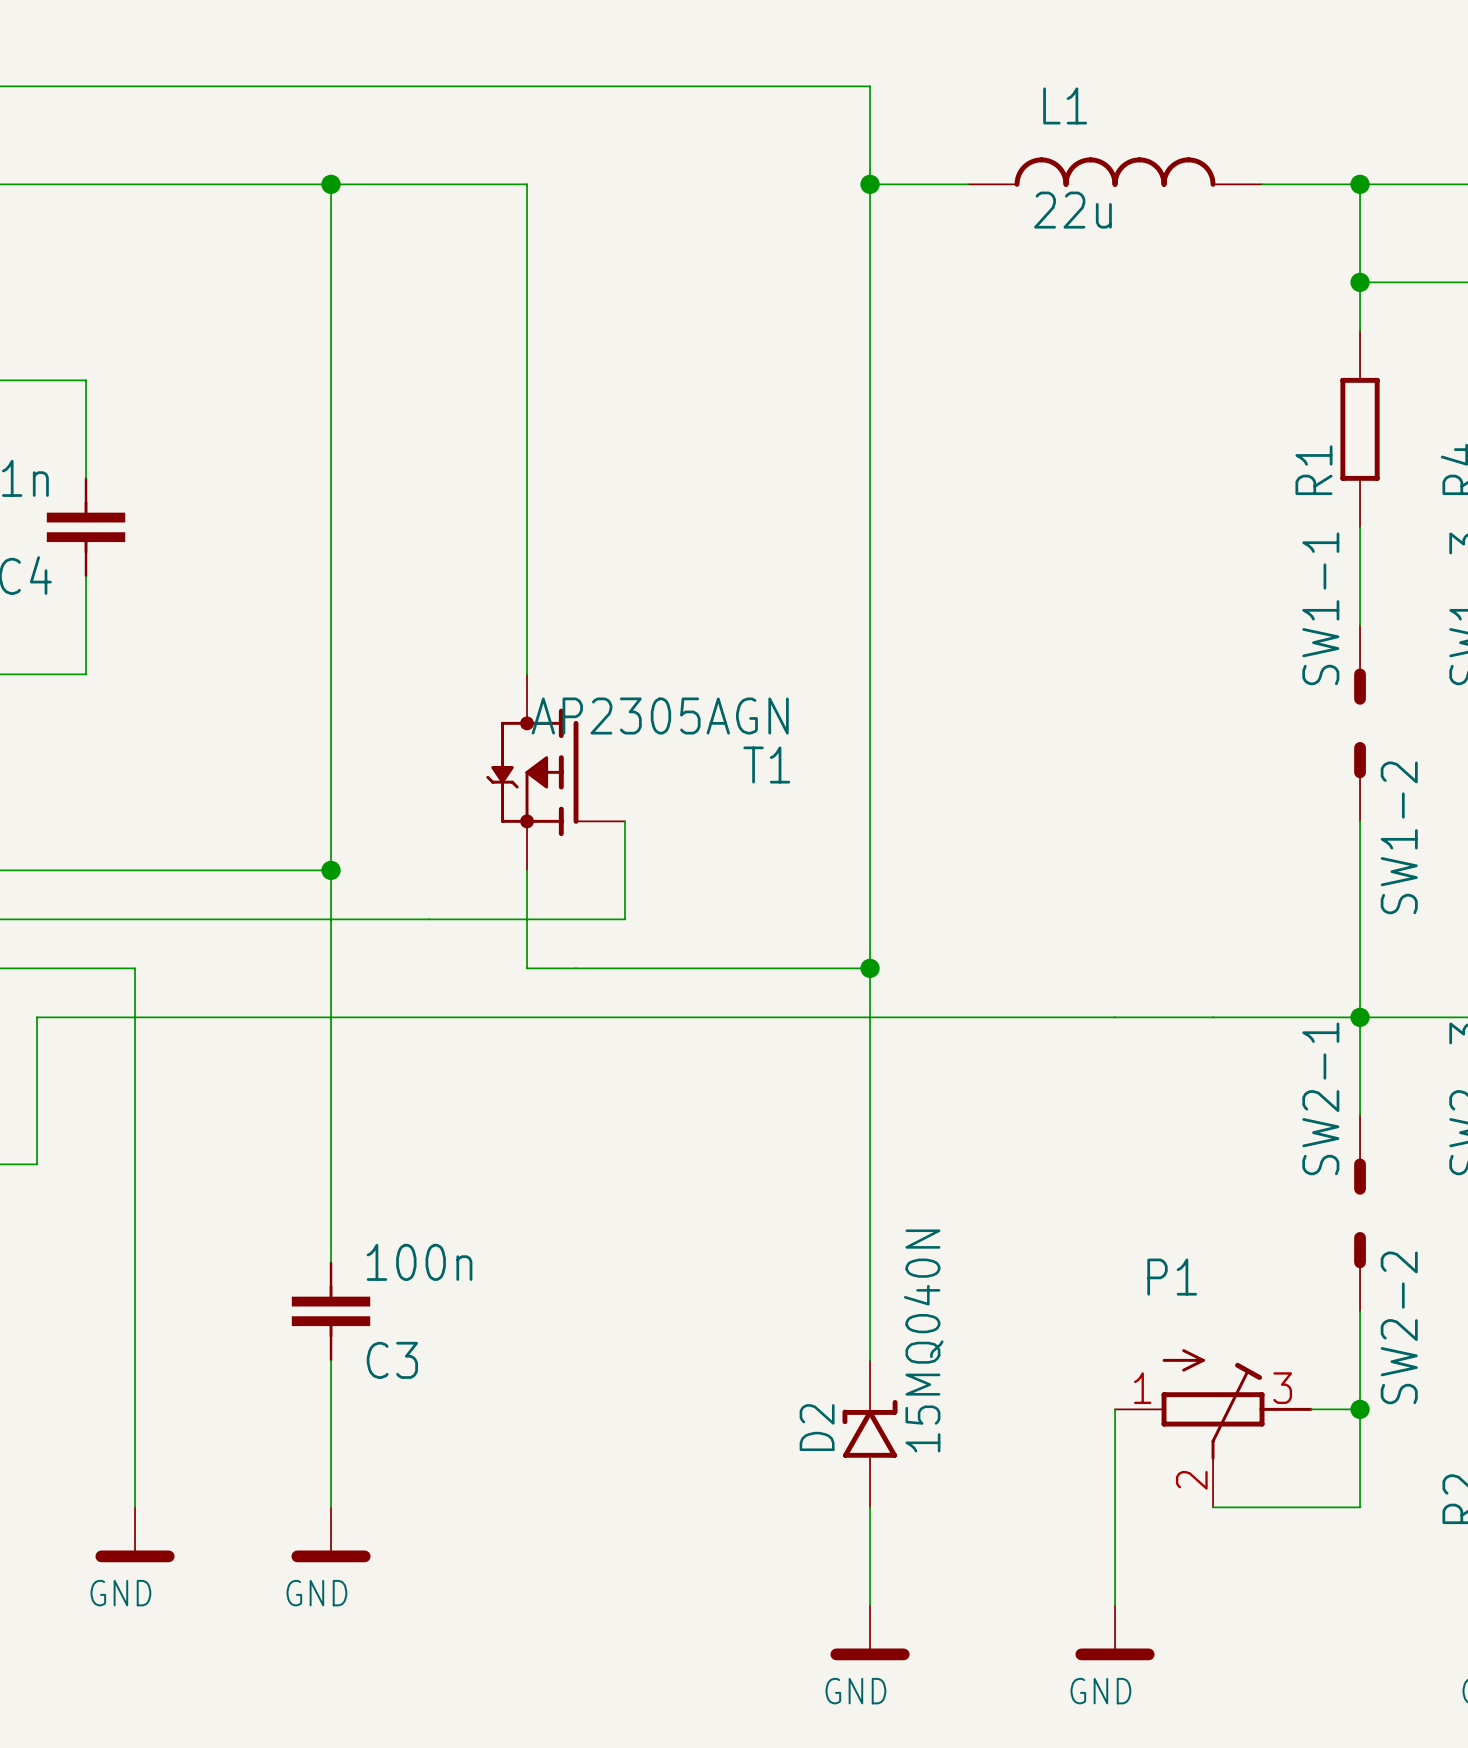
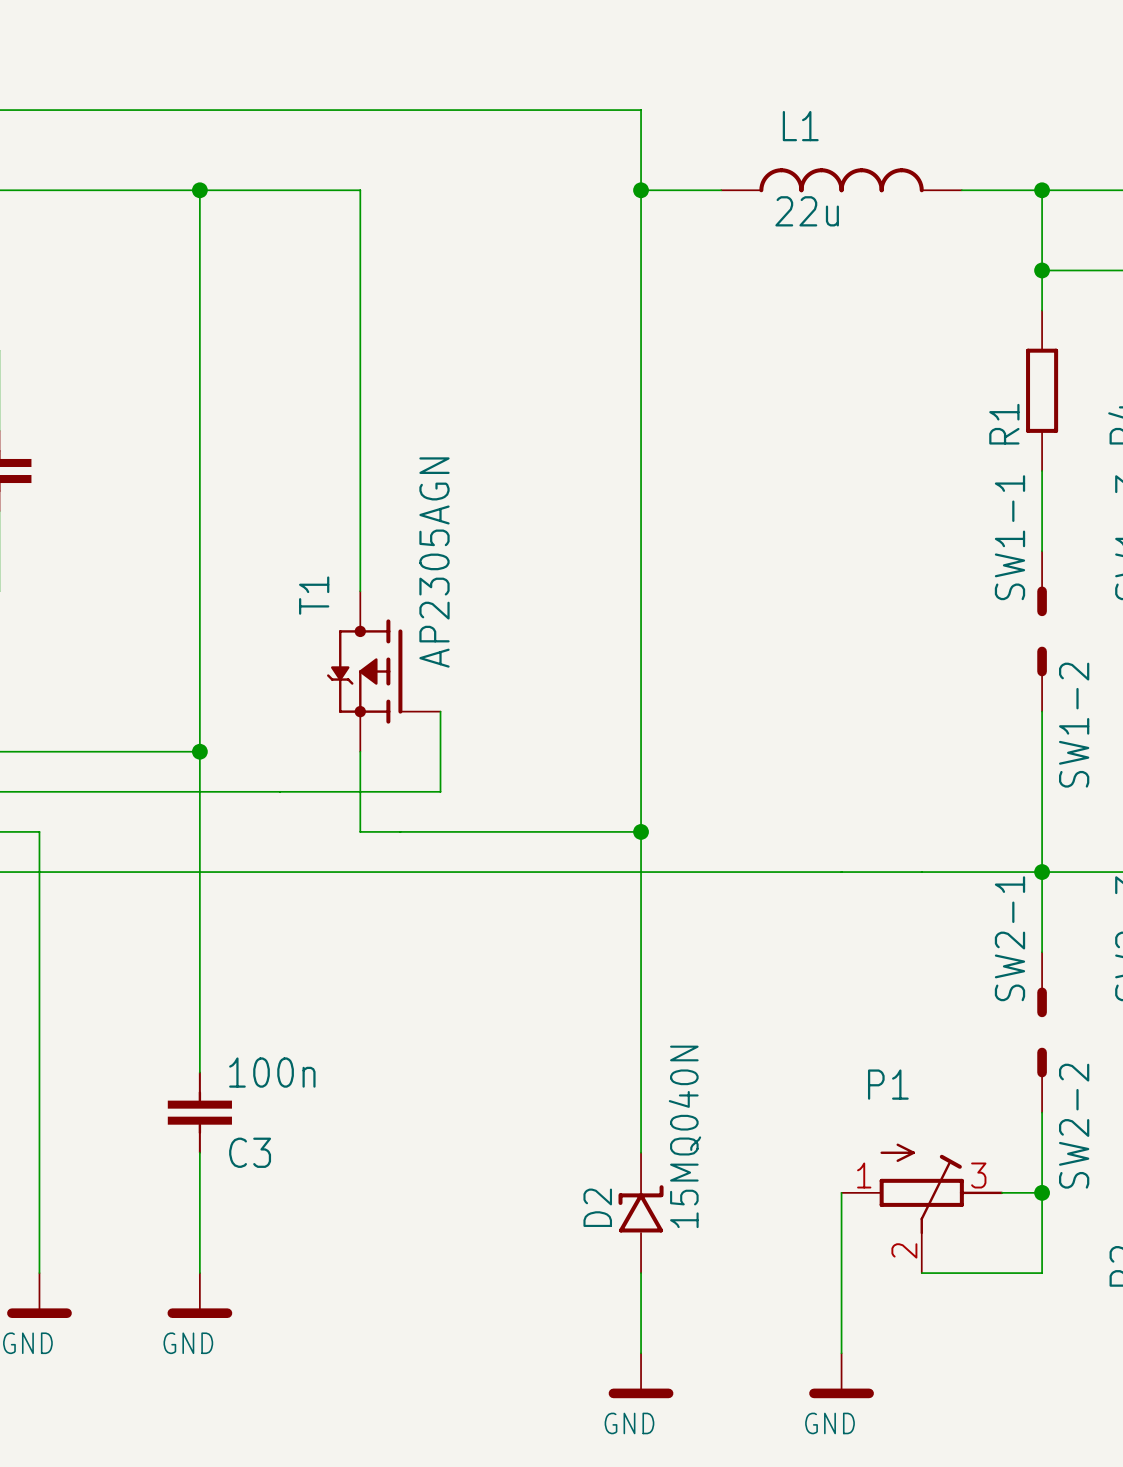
T1 value rotation: 0° (660, 716) -> 90° counterclockwise (434, 562)
T1 name rotation: 0° (766, 765) -> 90° counterclockwise (314, 595)
T1 name position: T1 (766, 765) -> T1 (314, 595)

